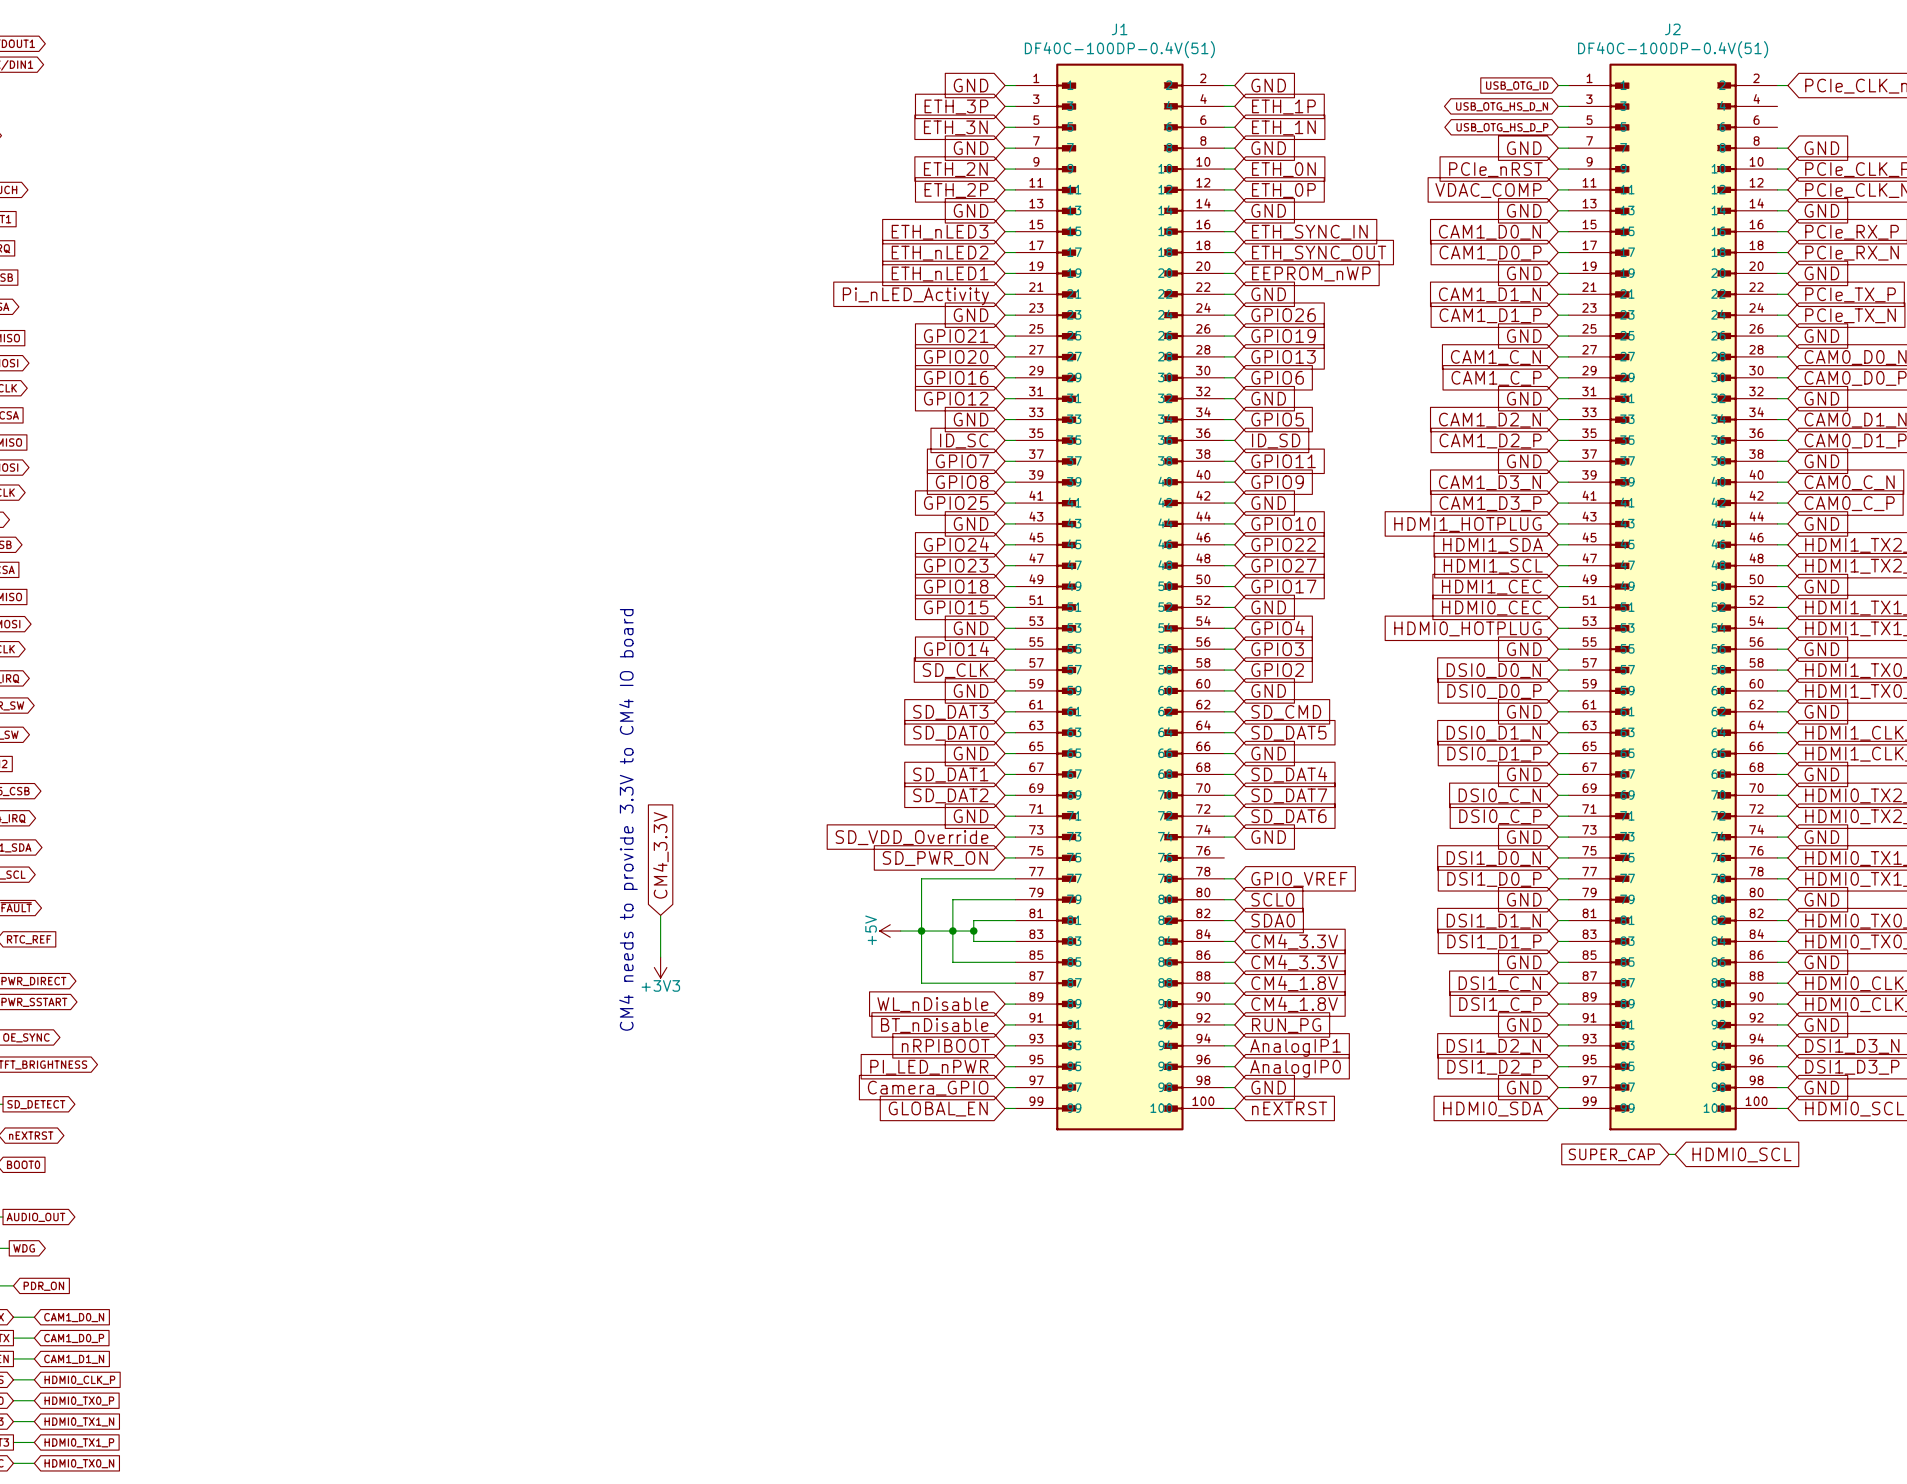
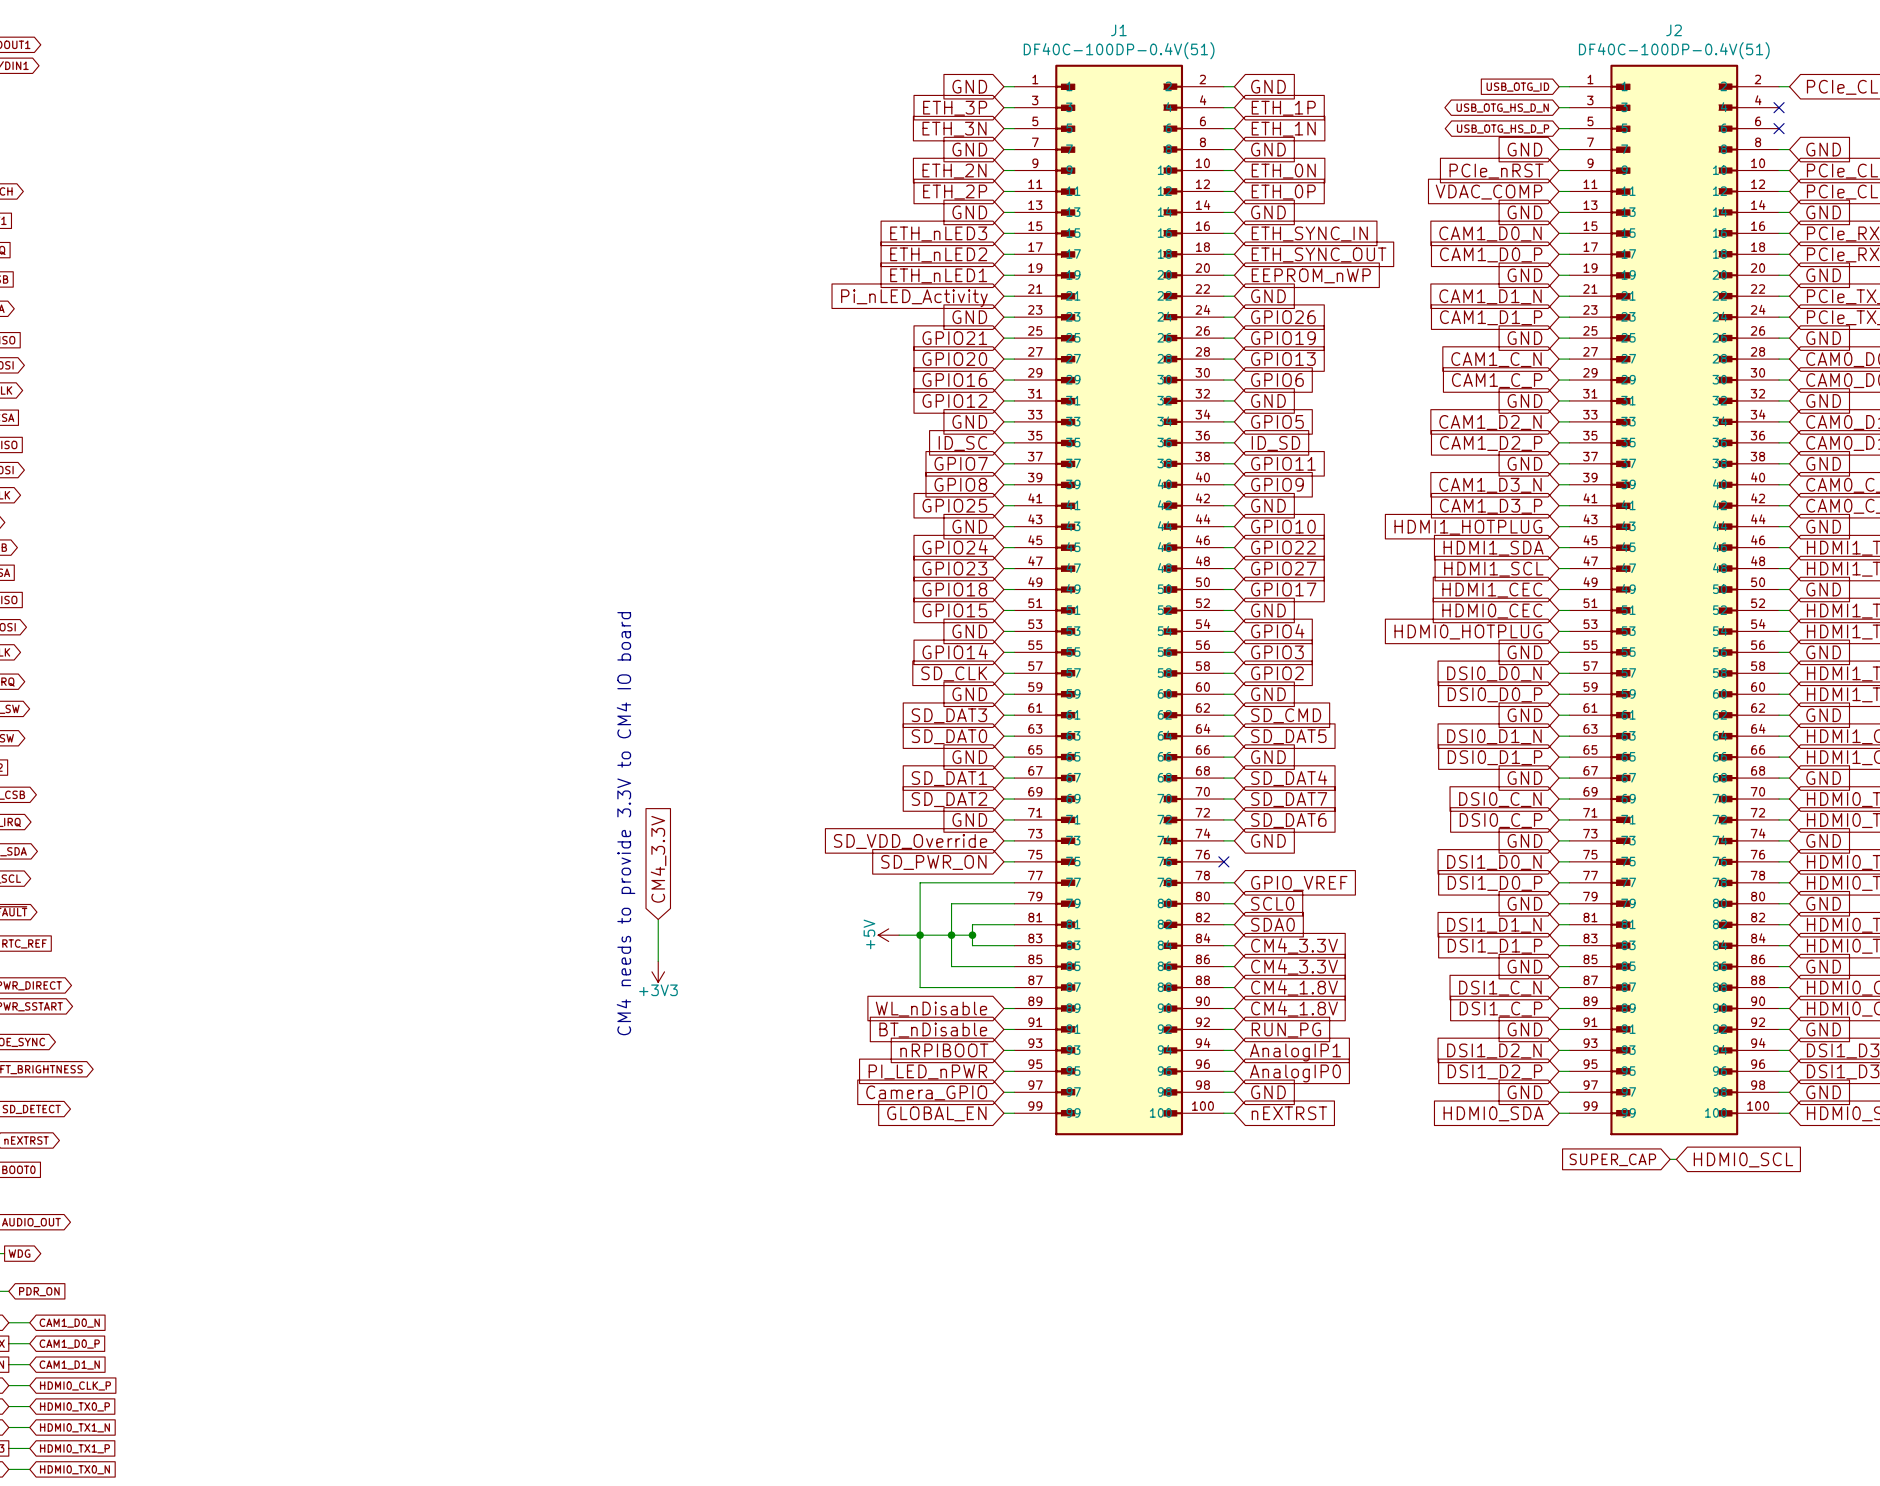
no-connect mark: none -> (1779, 107)
no-connect mark: none -> (1779, 128)
no-connect mark: none -> (1223, 861)

